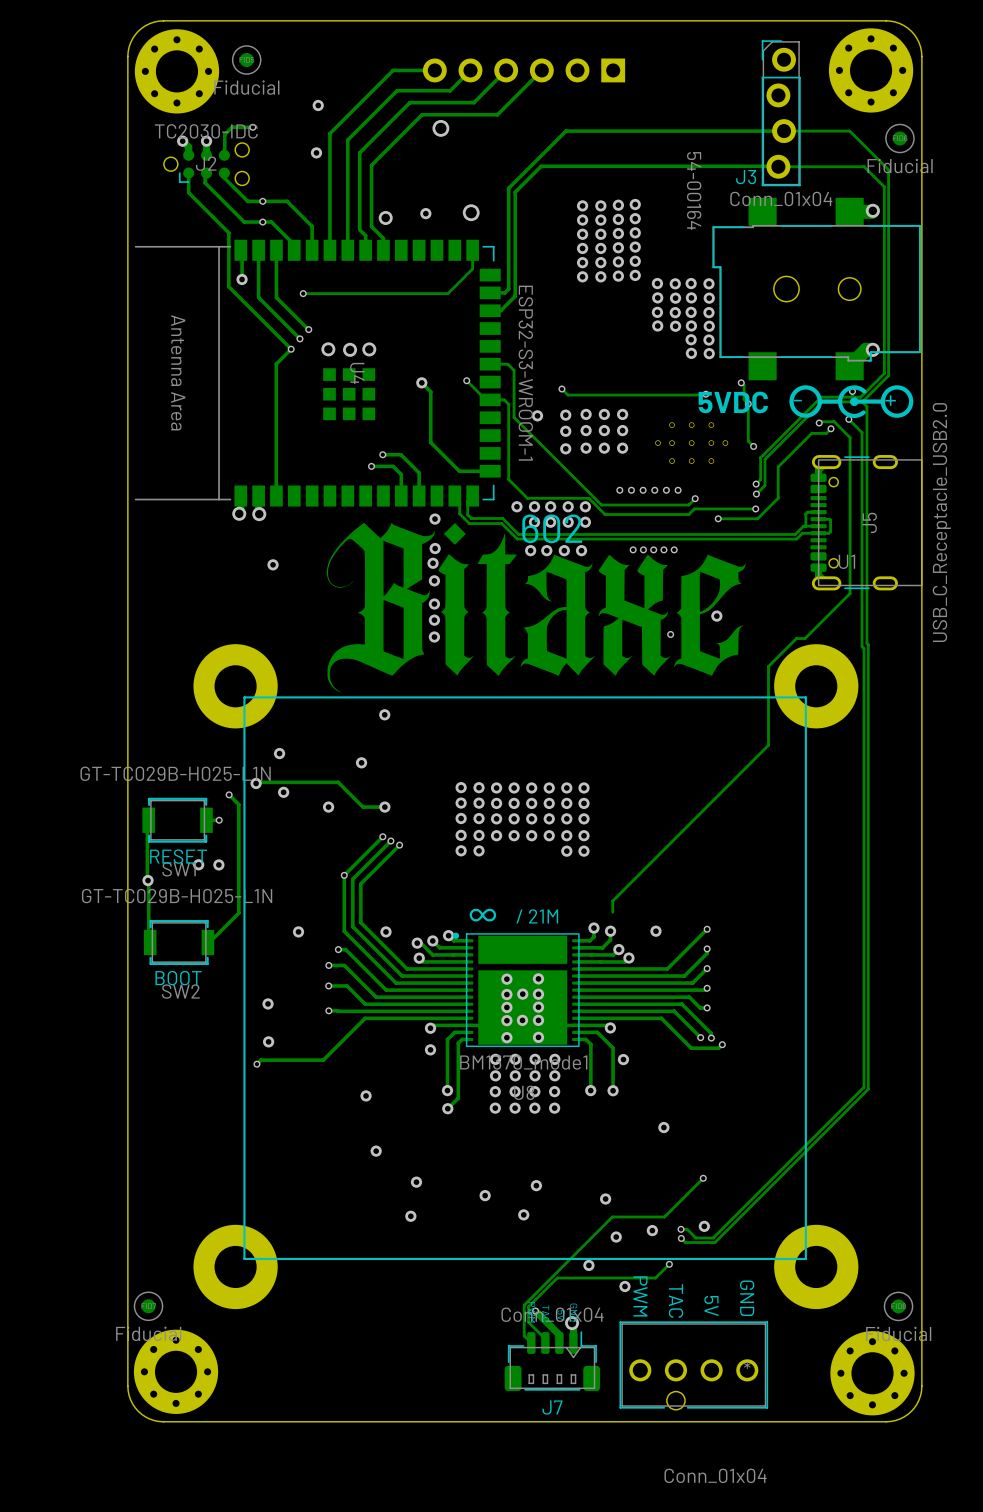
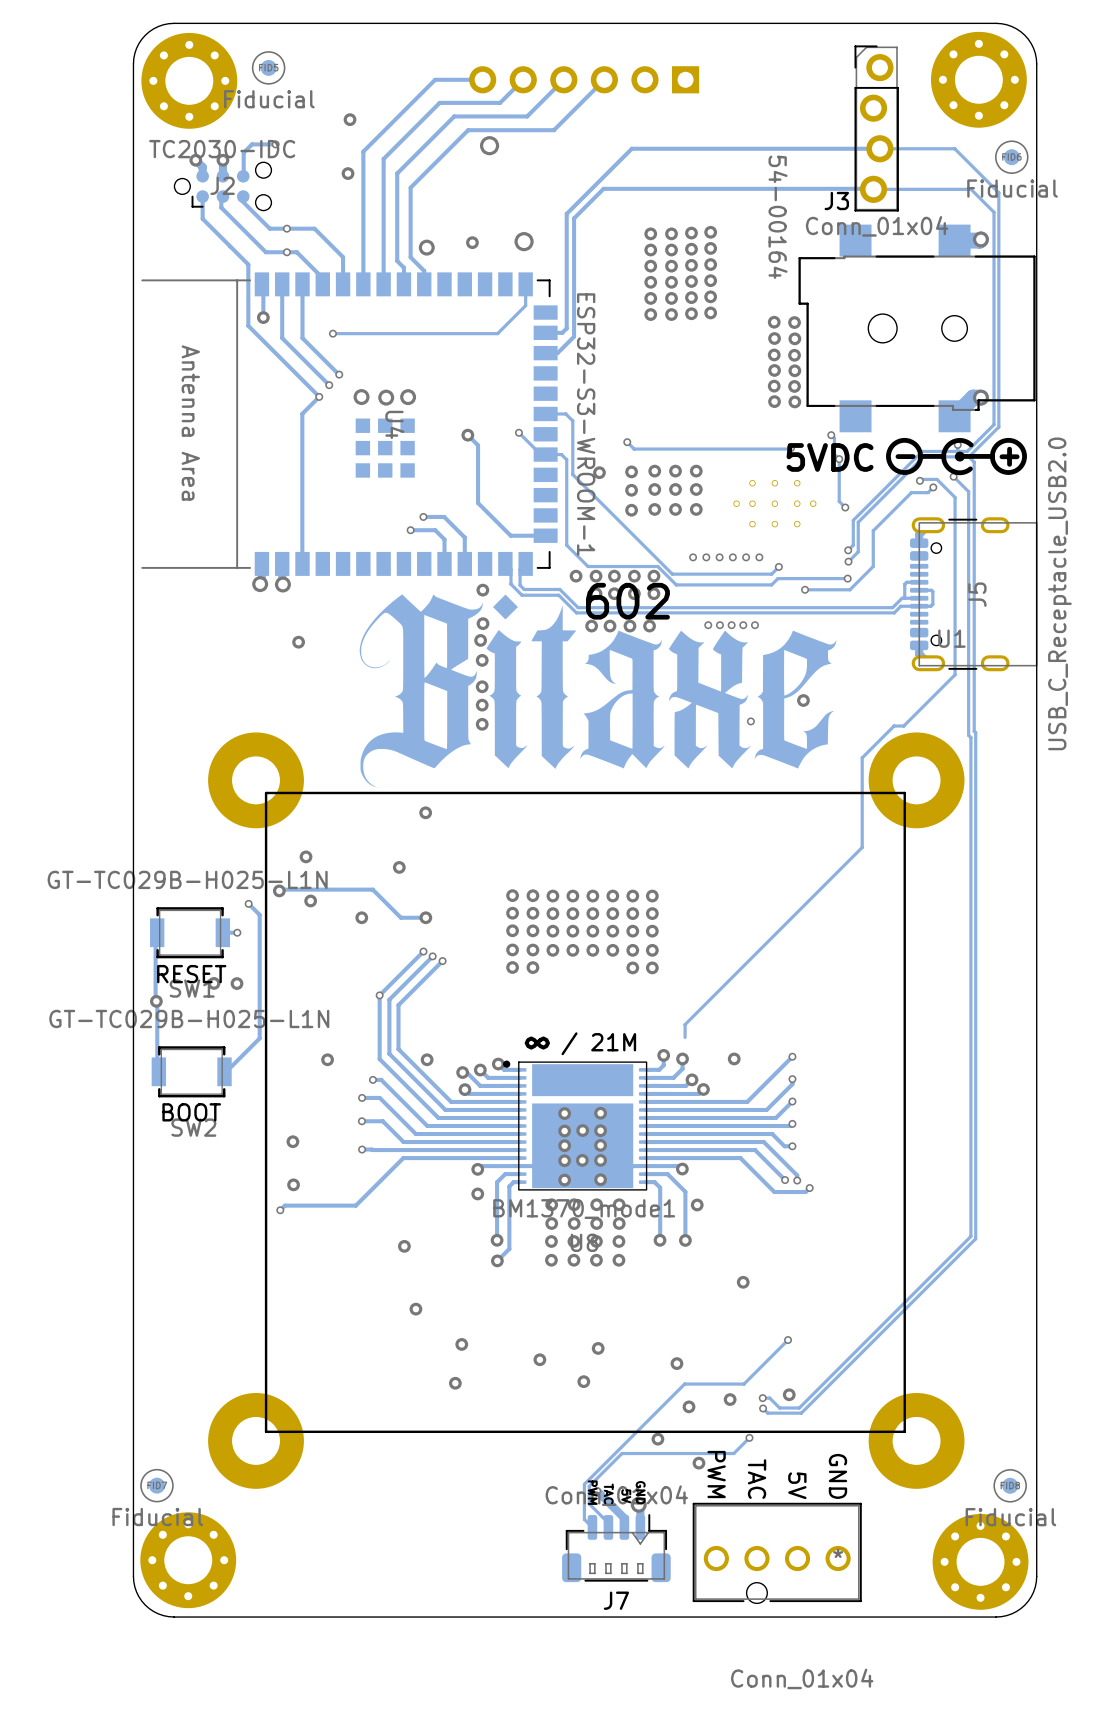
via: (657, 283) -> none
via: (675, 283) -> none
via: (657, 297) -> none
via: (675, 298) -> none
via: (657, 312) -> none
via: (675, 312) -> none
via: (657, 325) -> none
via: (675, 326) -> none

